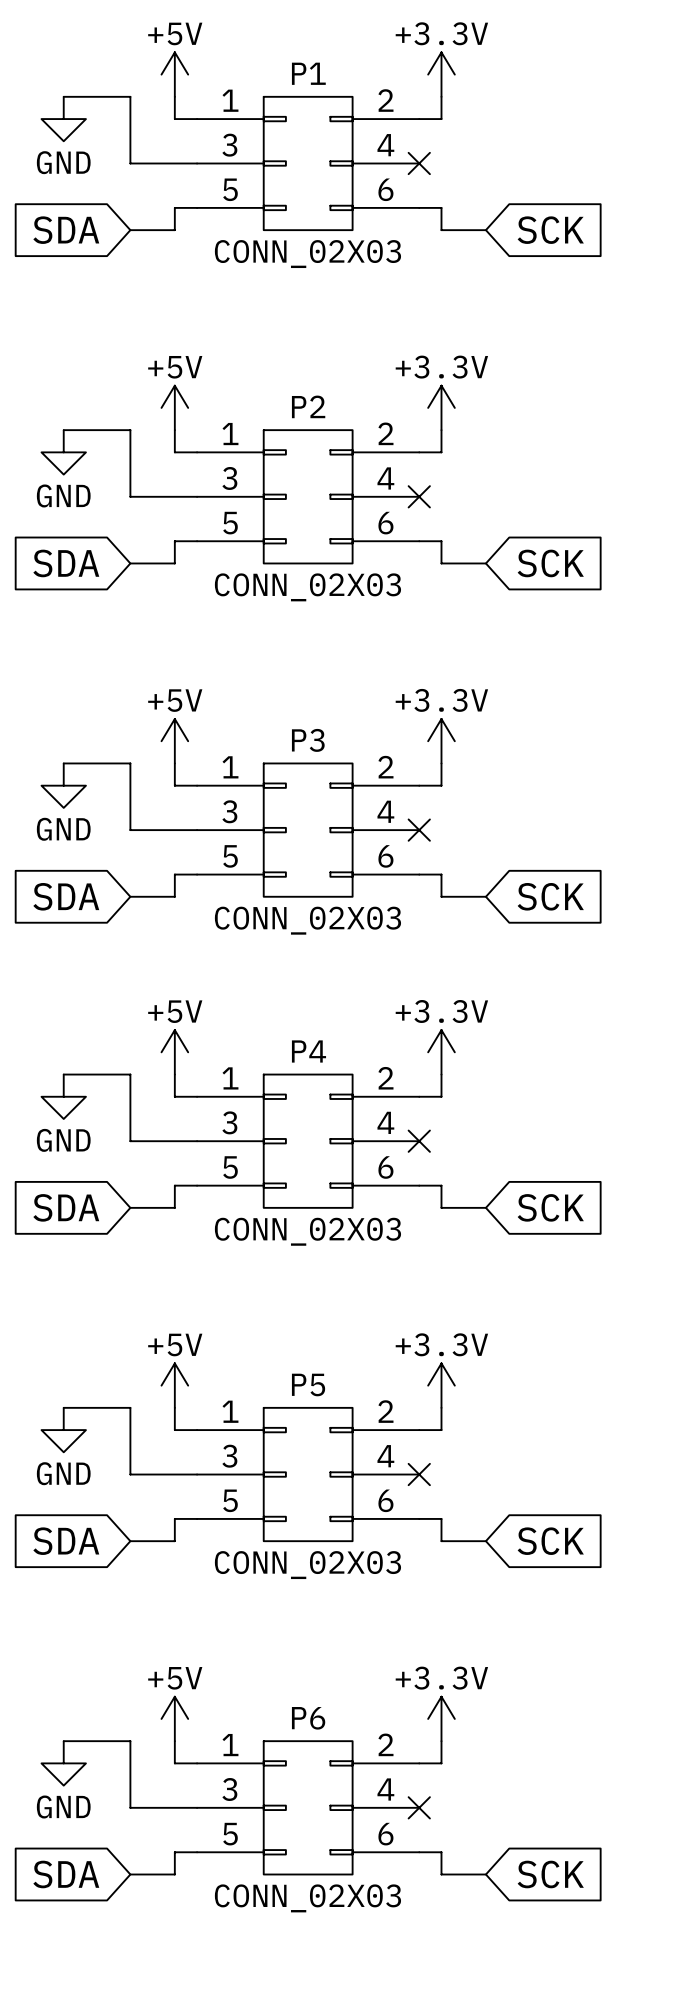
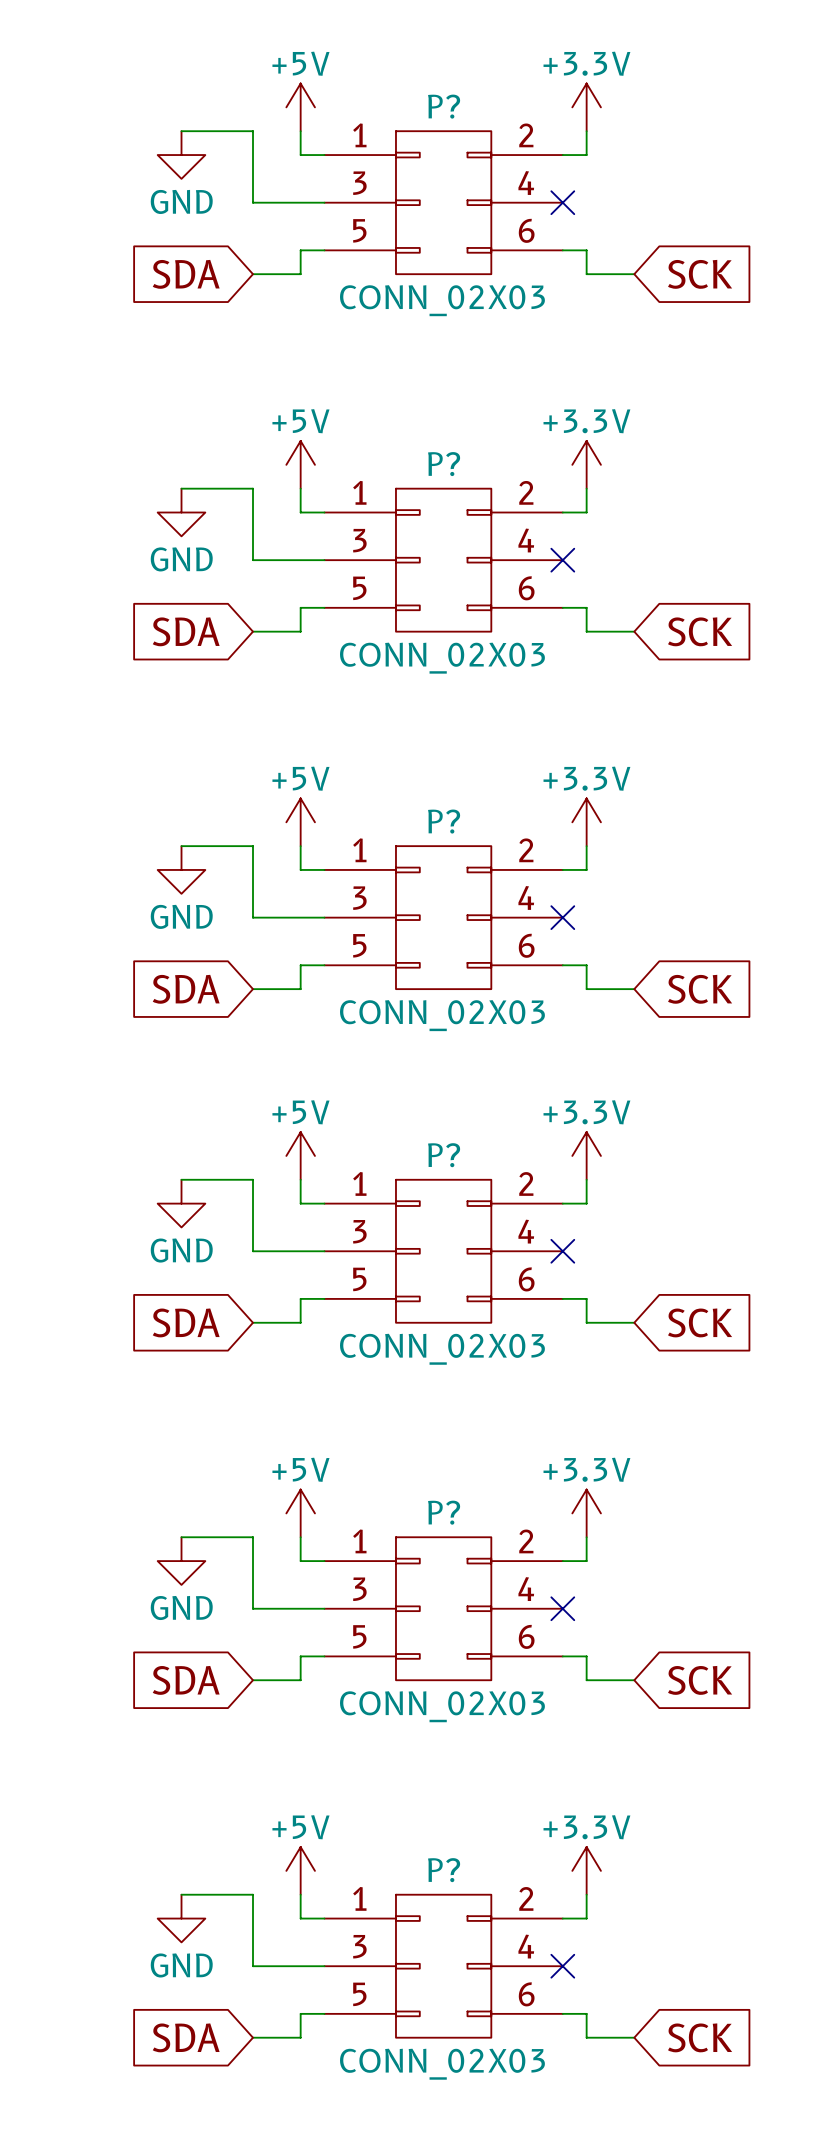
P1 name: P1 (308, 73) -> P? (444, 106)
P2 name: P2 (308, 406) -> P? (444, 464)
P3 name: P3 (308, 740) -> P? (444, 821)
P4 name: P4 (308, 1051) -> P? (444, 1155)
P5 name: P5 (308, 1385) -> P? (444, 1512)
P6 name: P6 (308, 1718) -> P? (444, 1870)

